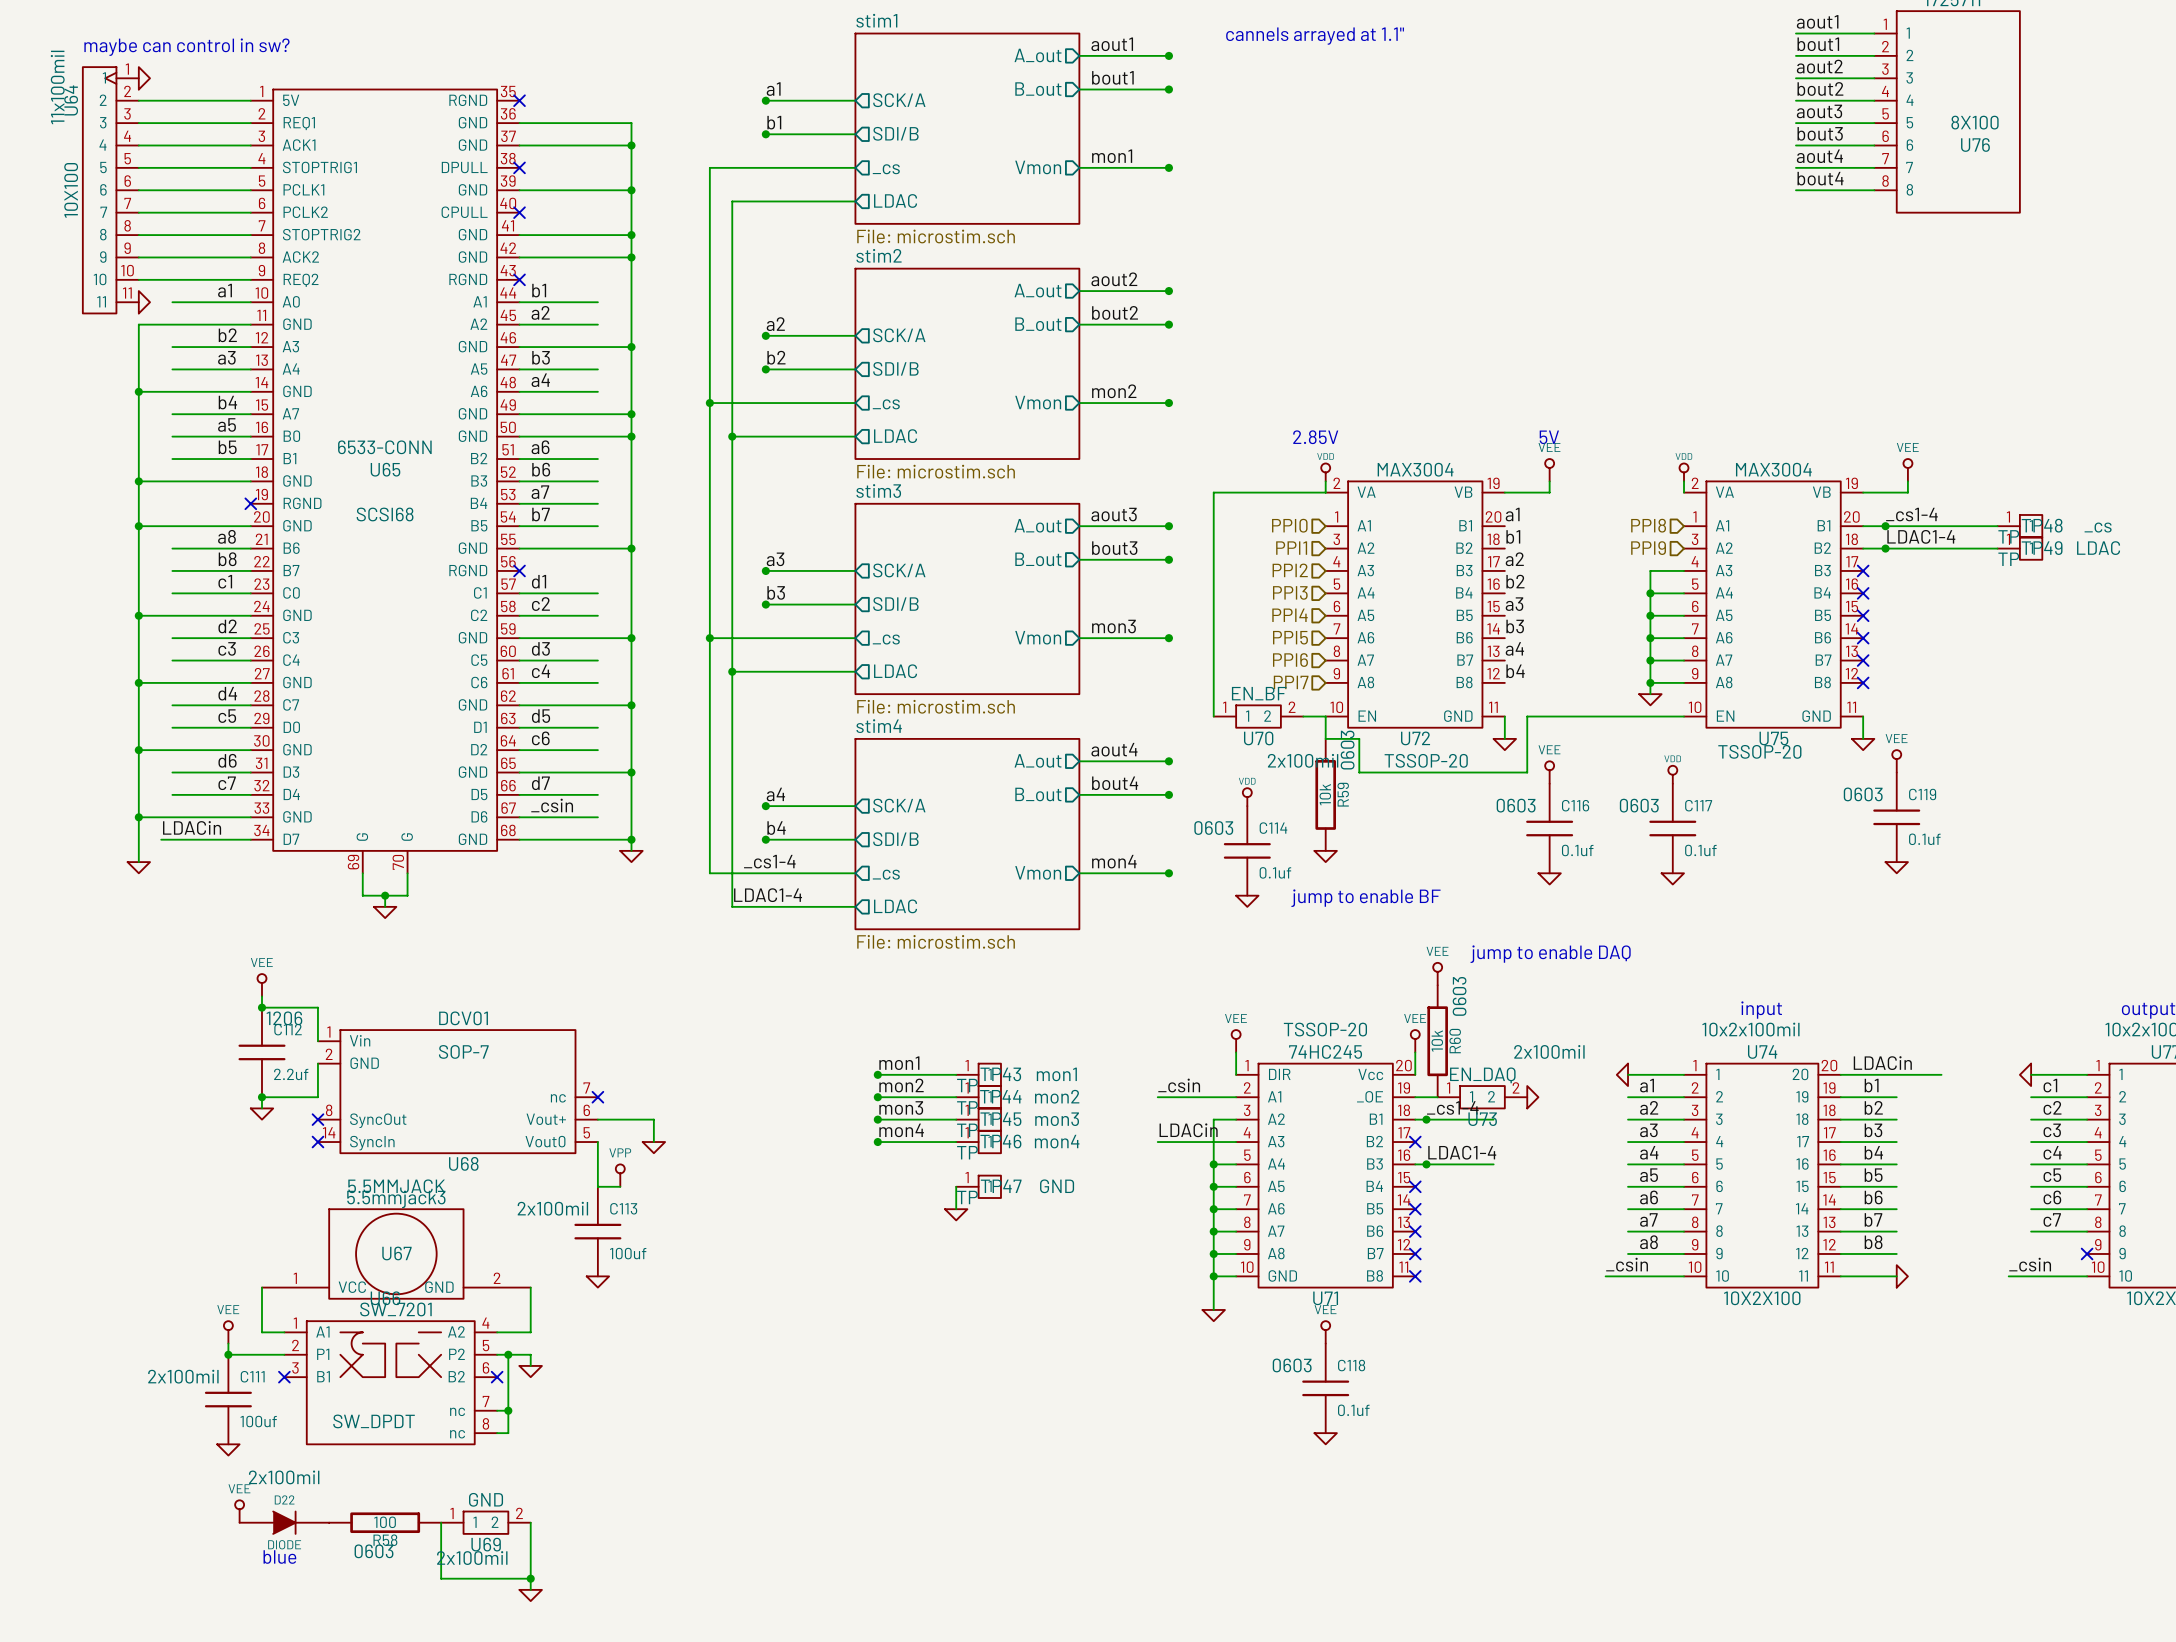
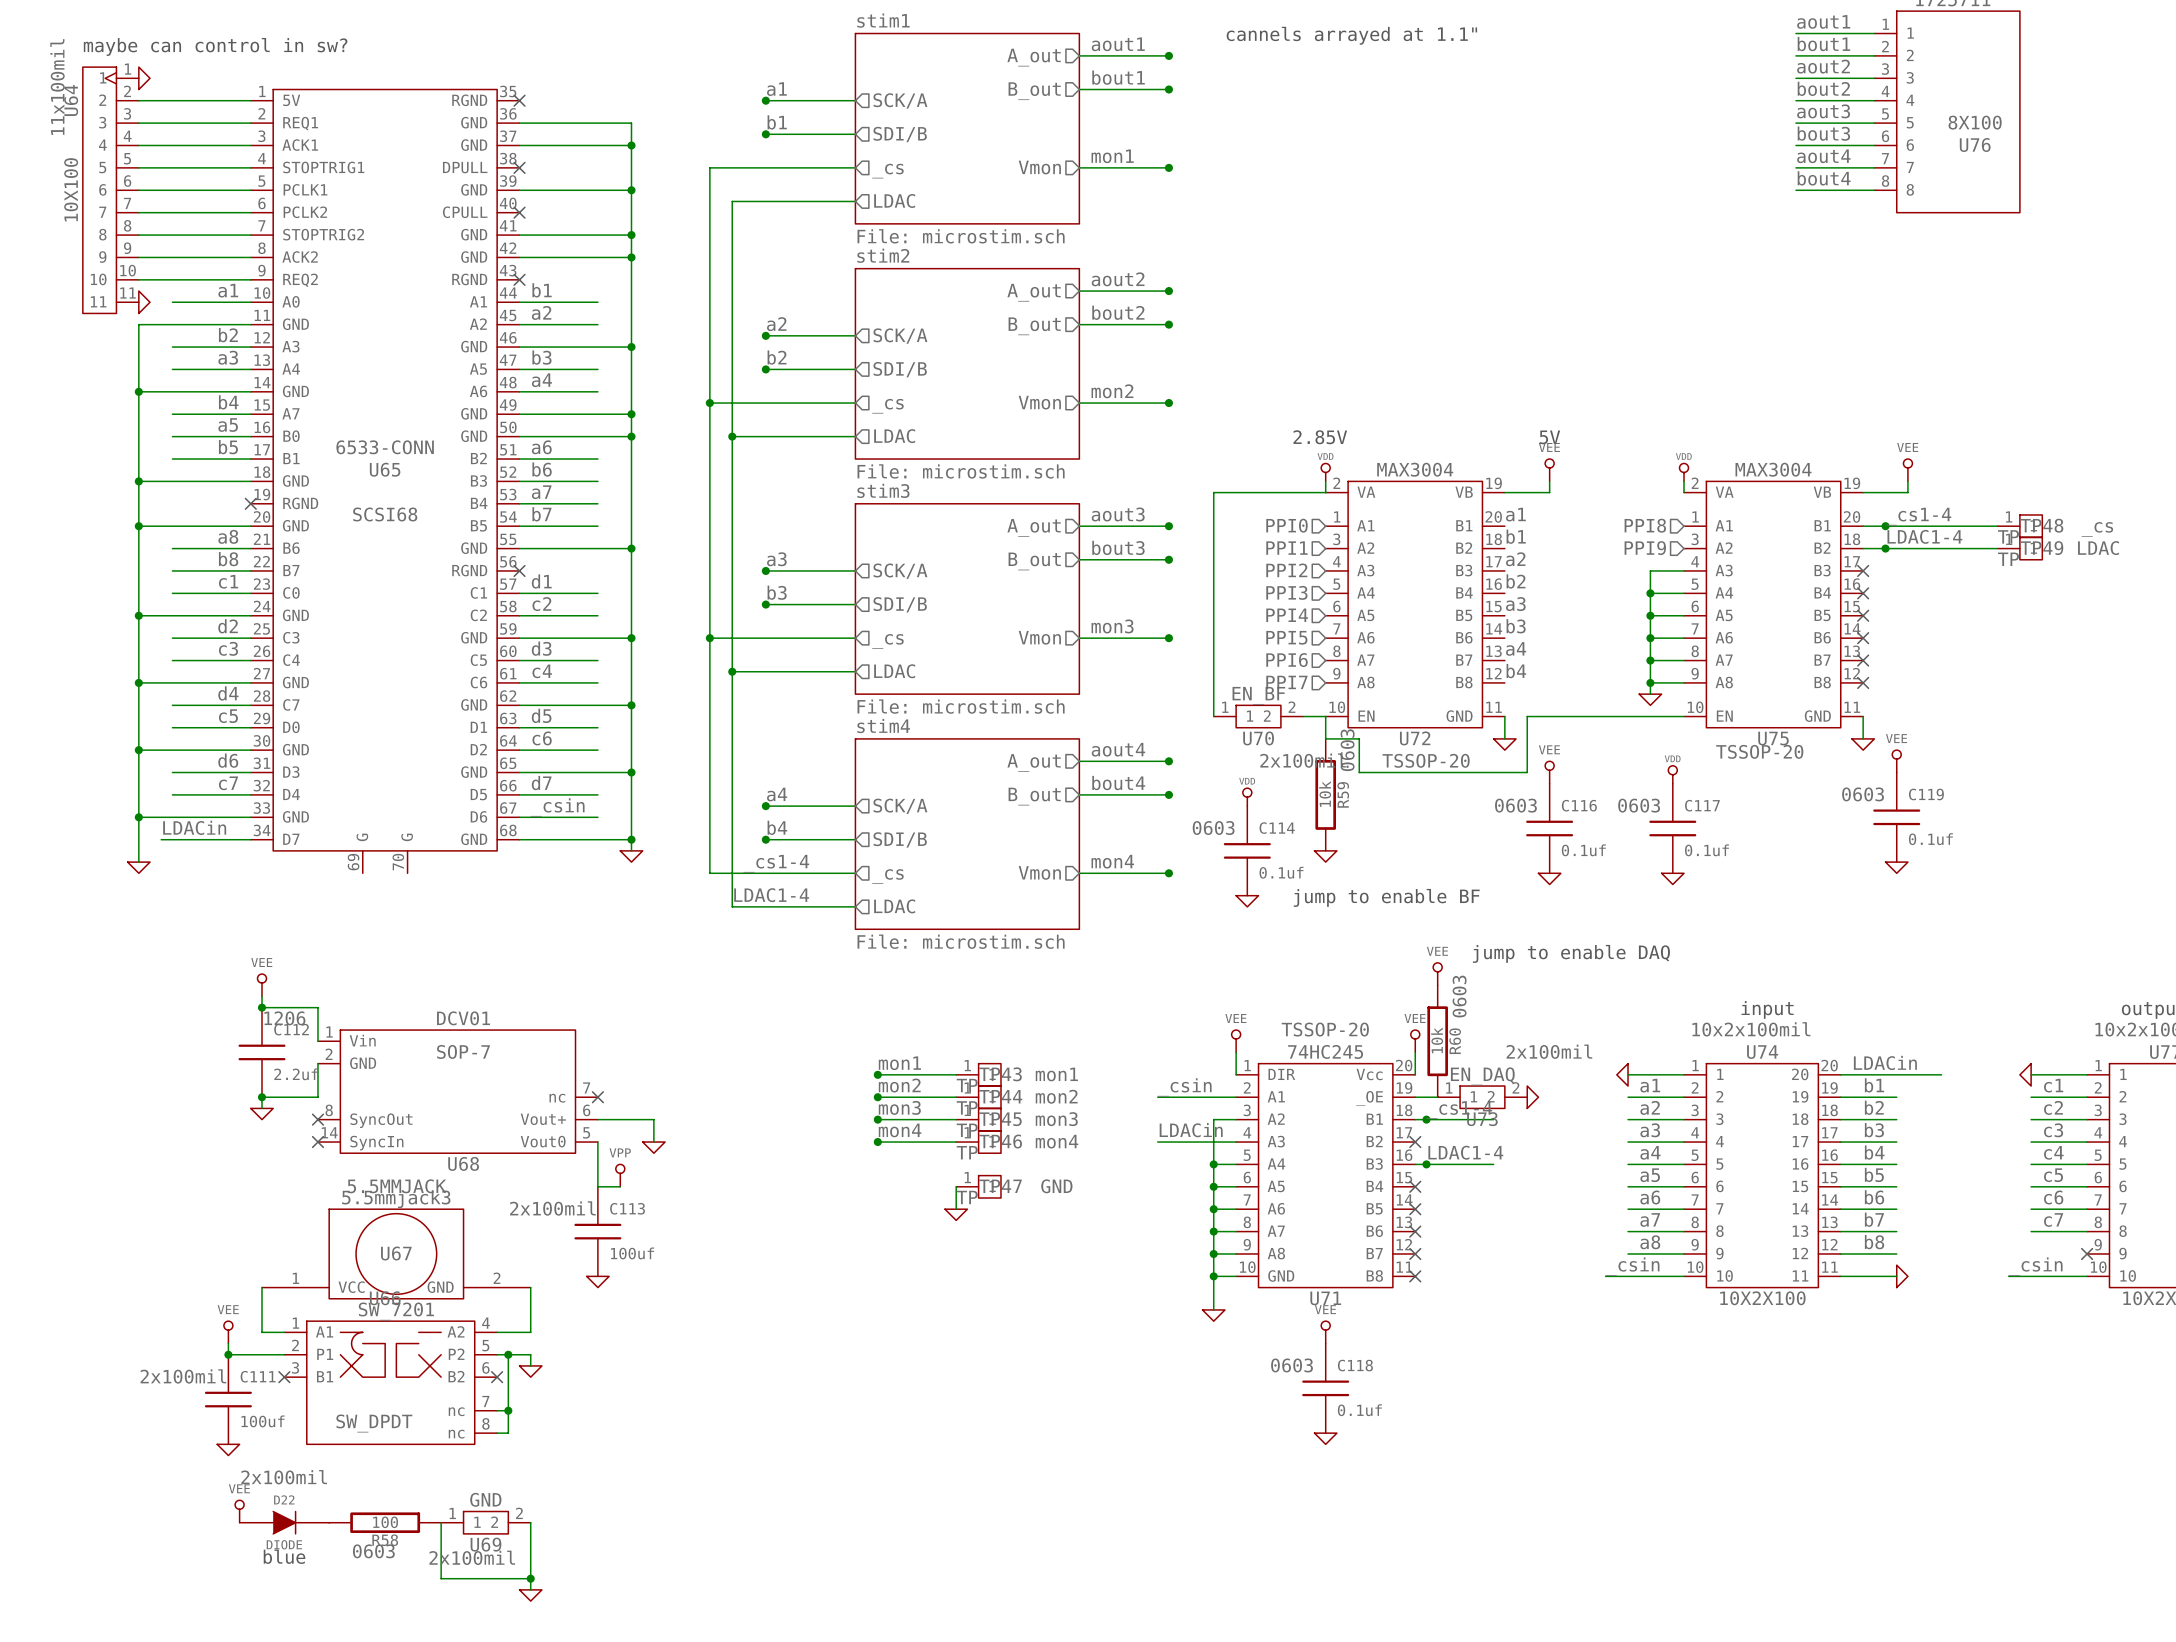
wire: (362, 873) (362, 895) (407, 895) (407, 873) -> none
wire: (385, 895) (385, 906) -> none
junction: (385, 895) -> none
power symbol: (385, 912) -> none

